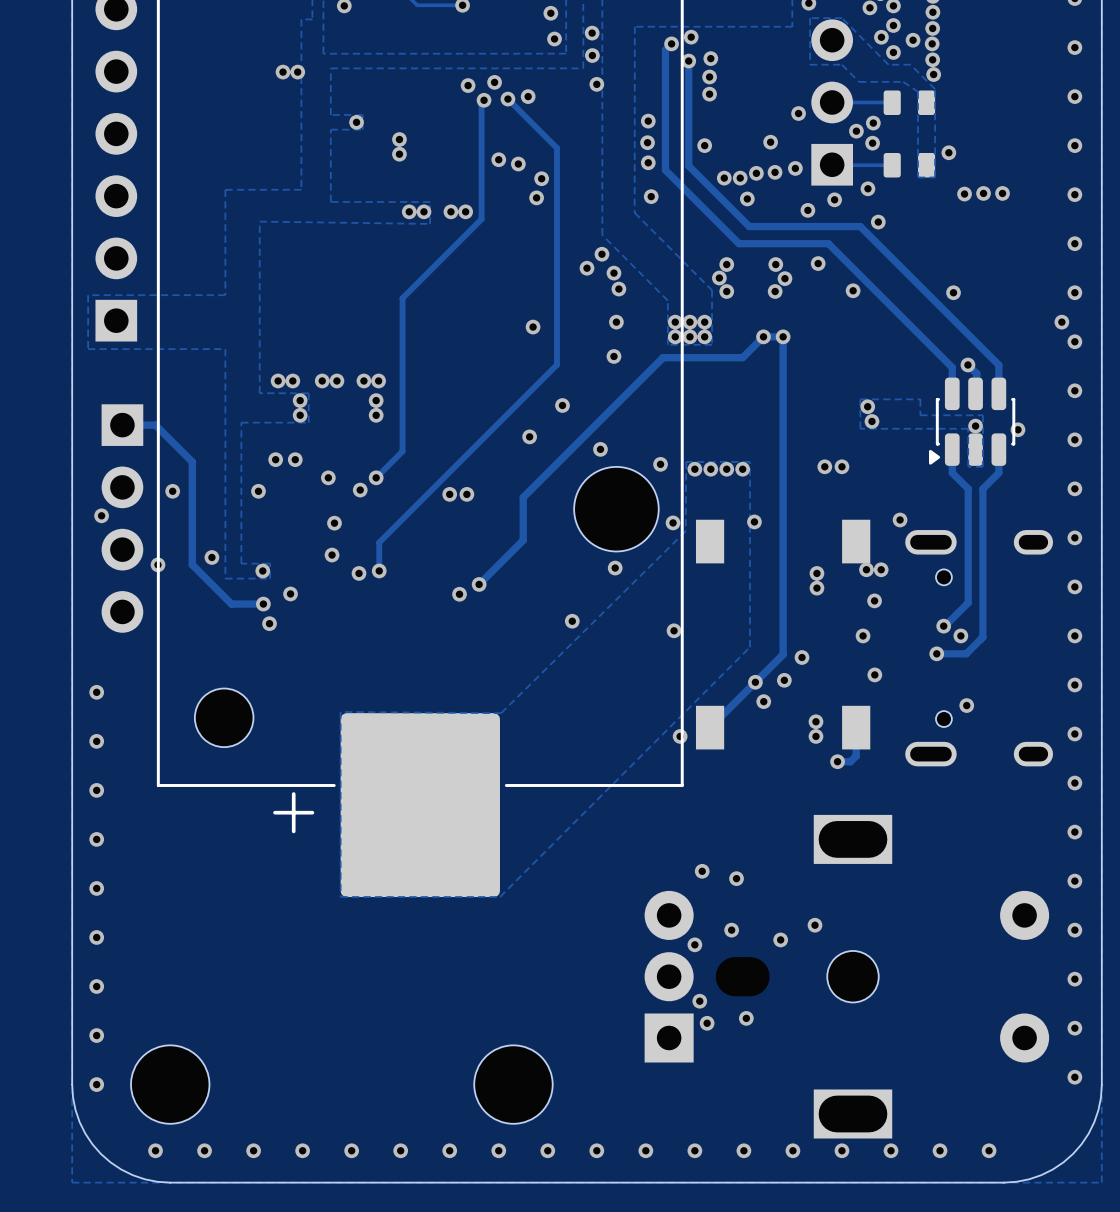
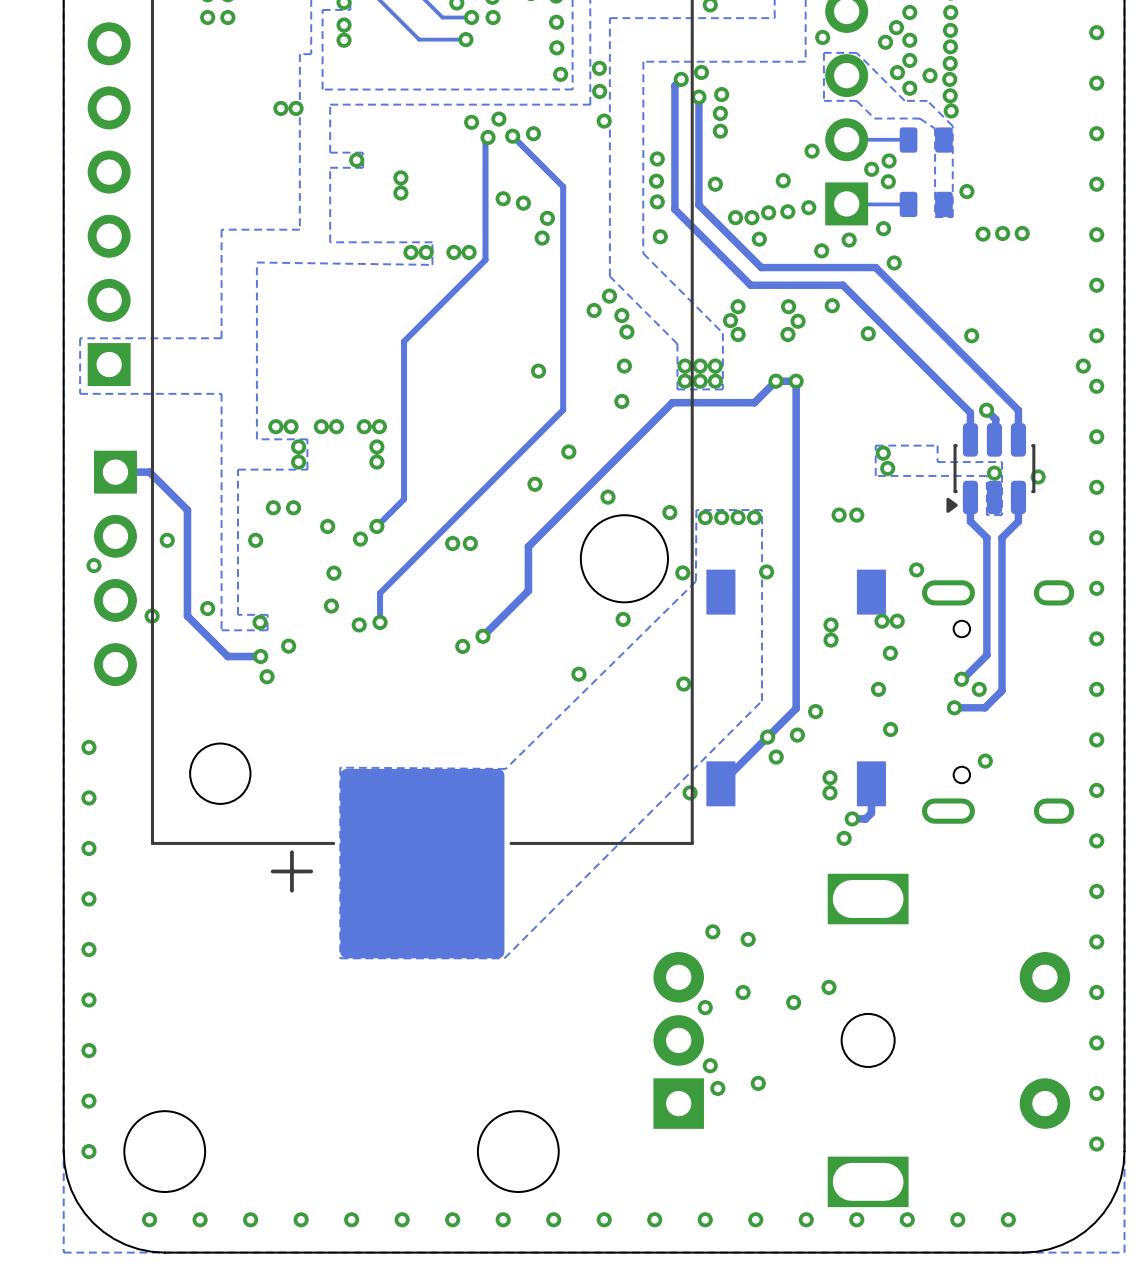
via: none -> (844, 838)

